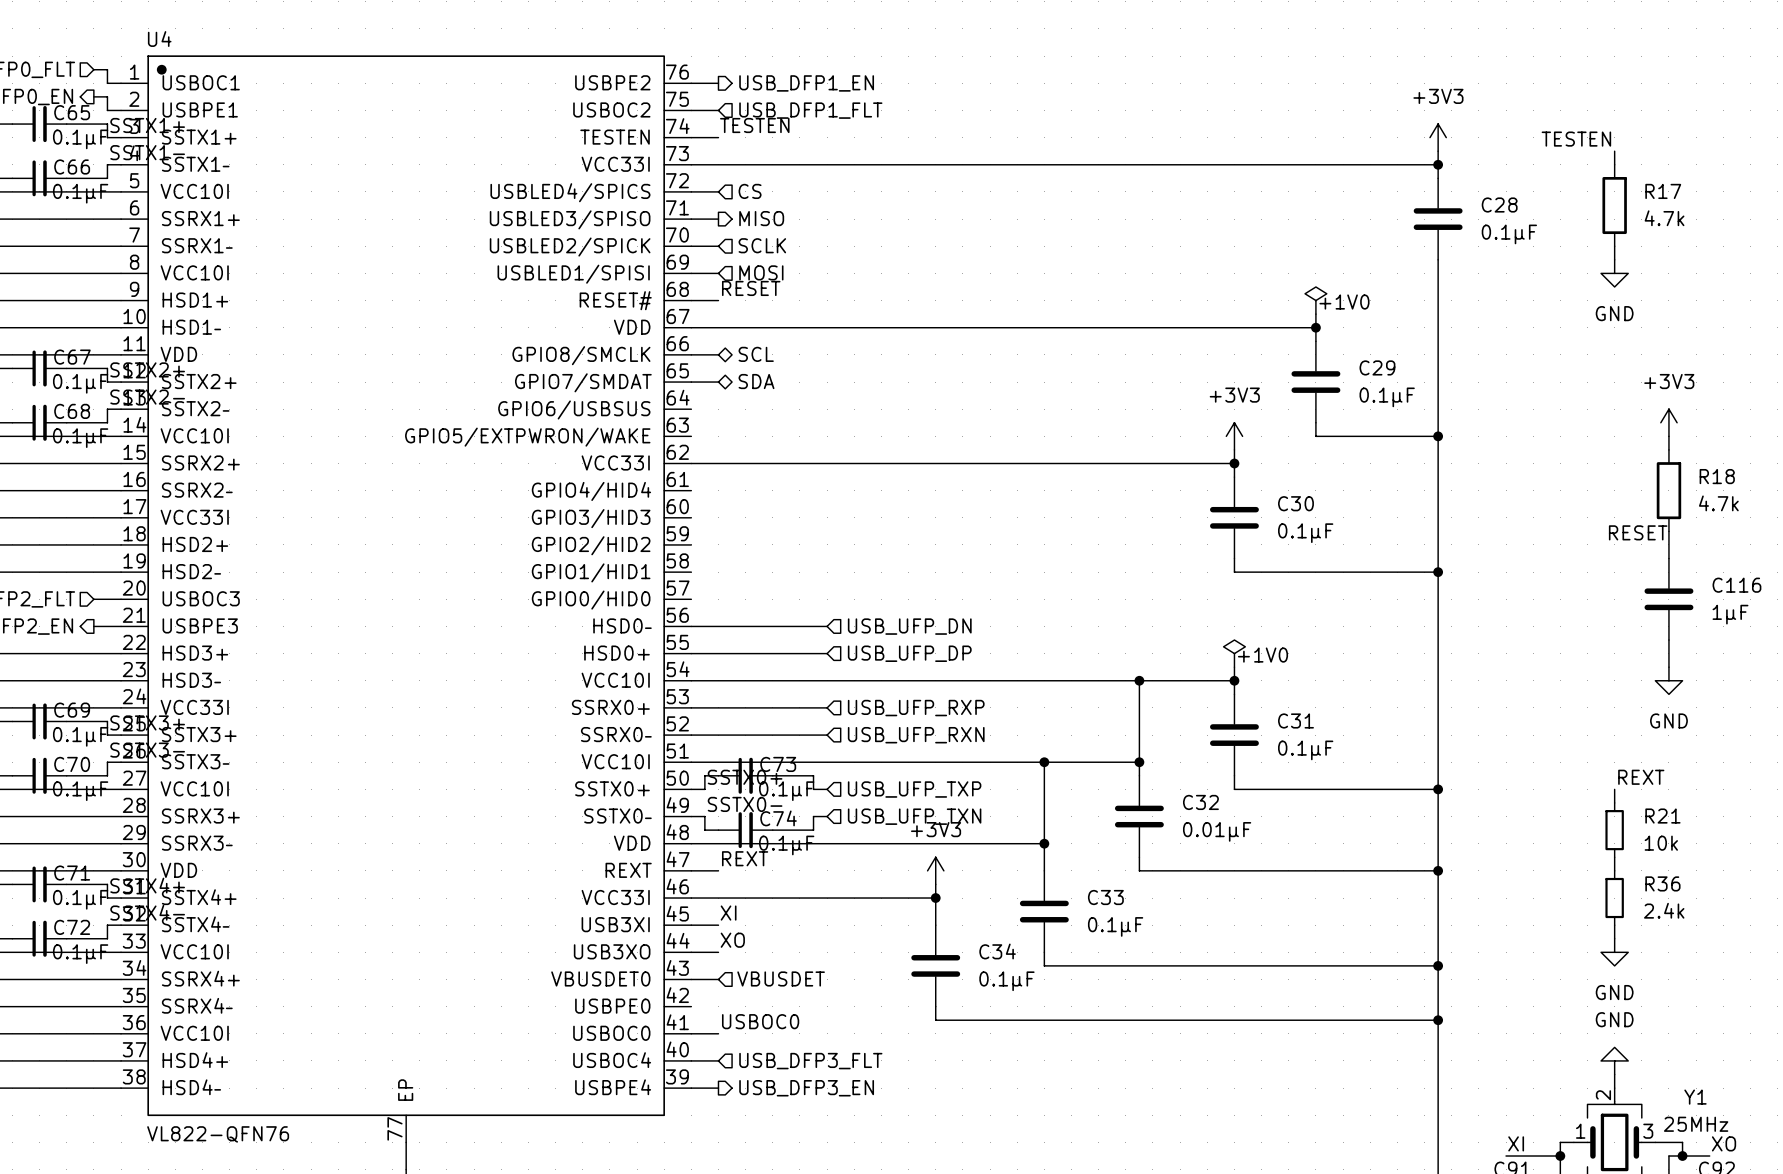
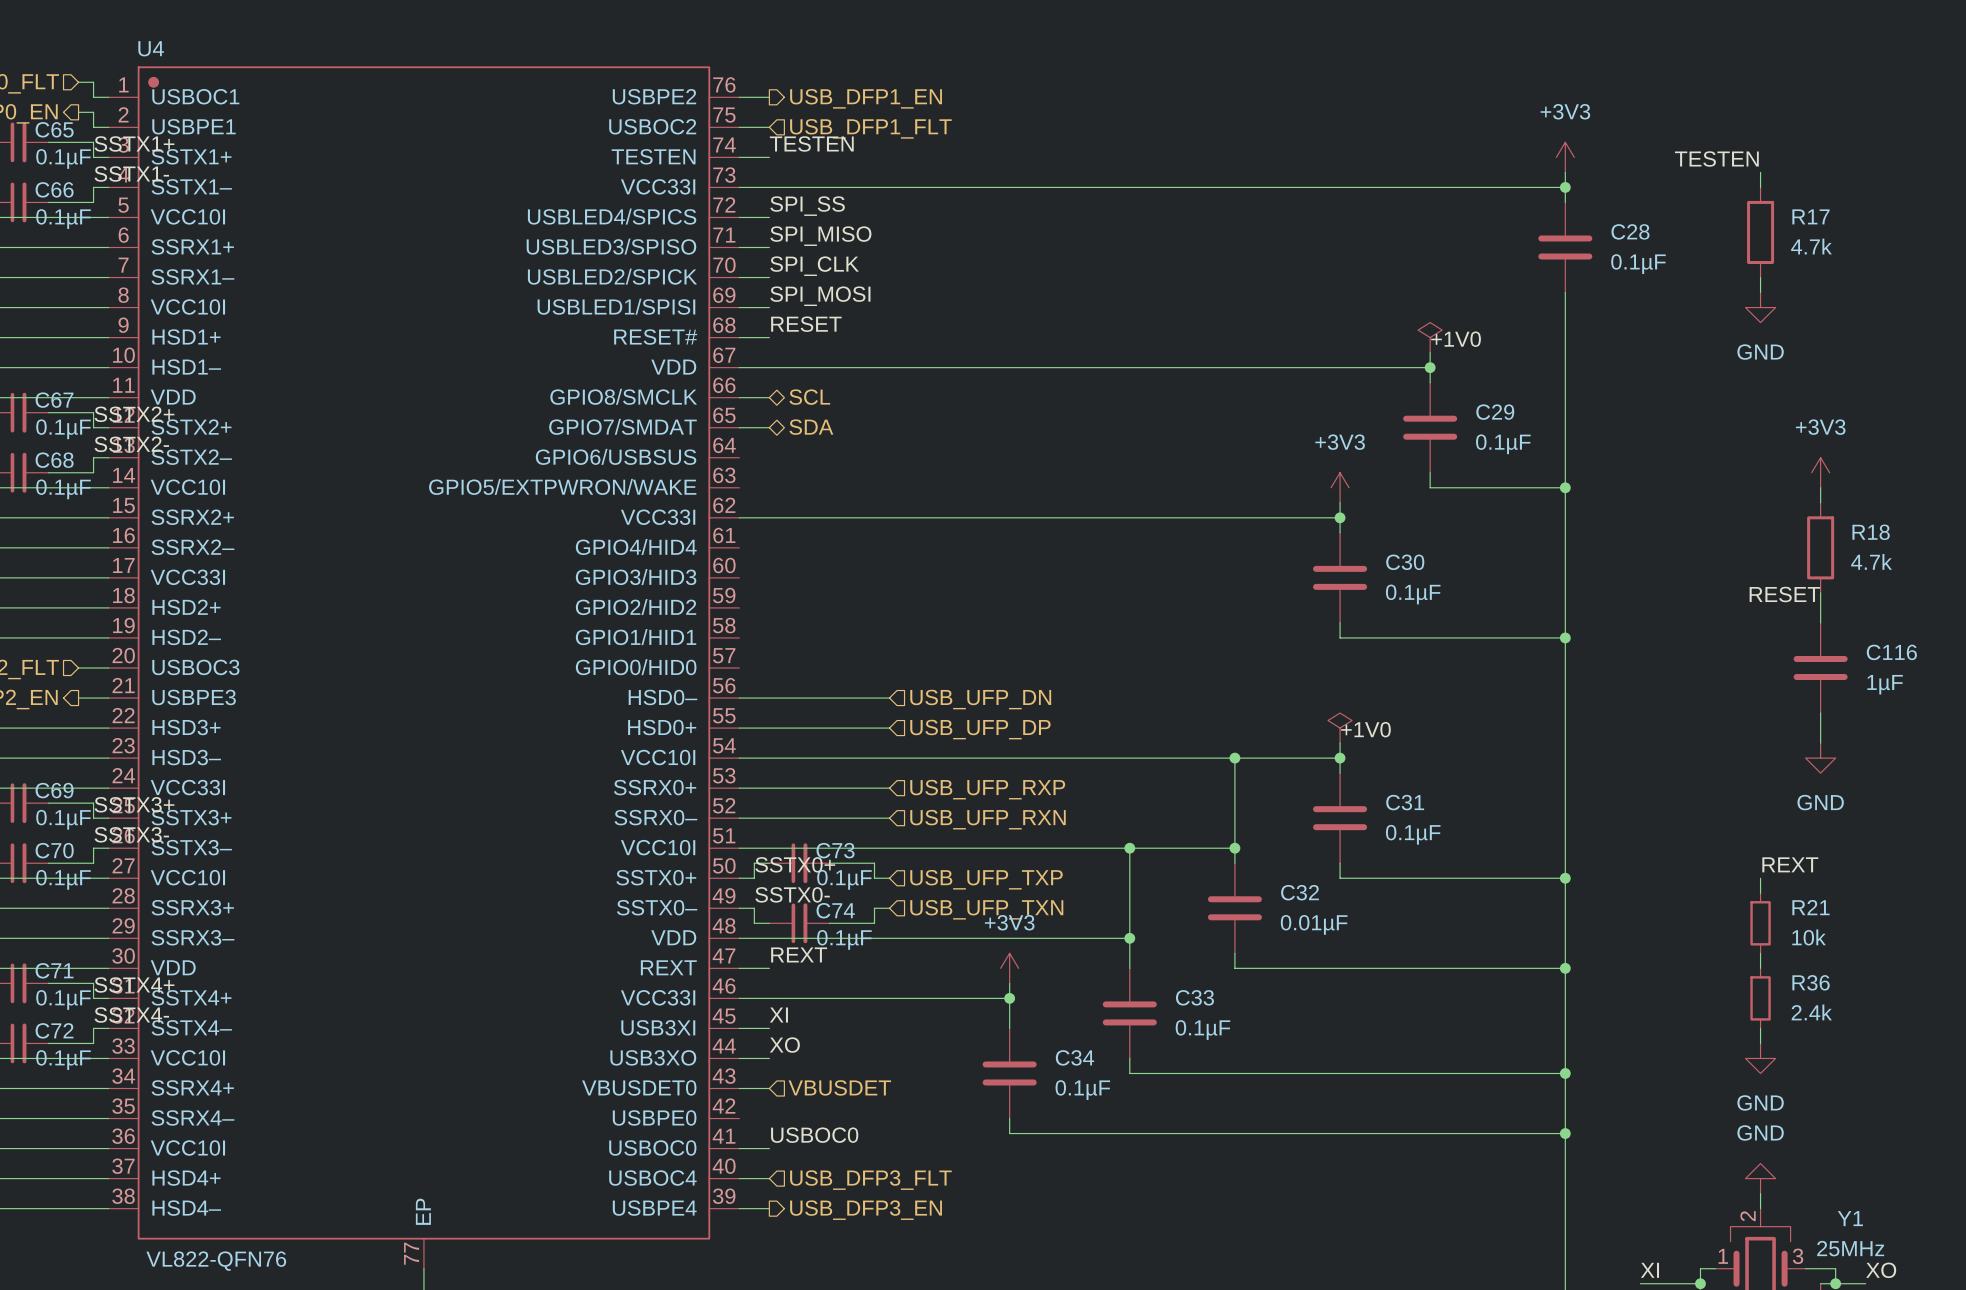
label: none -> SPI_SS (807, 206)
hierarchical label: CS (750, 191) -> none
label: none -> SPI_MISO (820, 236)
hierarchical label: MISO (761, 218) -> none
label: none -> SPI_CLK (814, 266)
hierarchical label: SCLK (762, 245) -> none
label: none -> SPI_MOSI (820, 296)
hierarchical label: MOSI (761, 272) -> none

